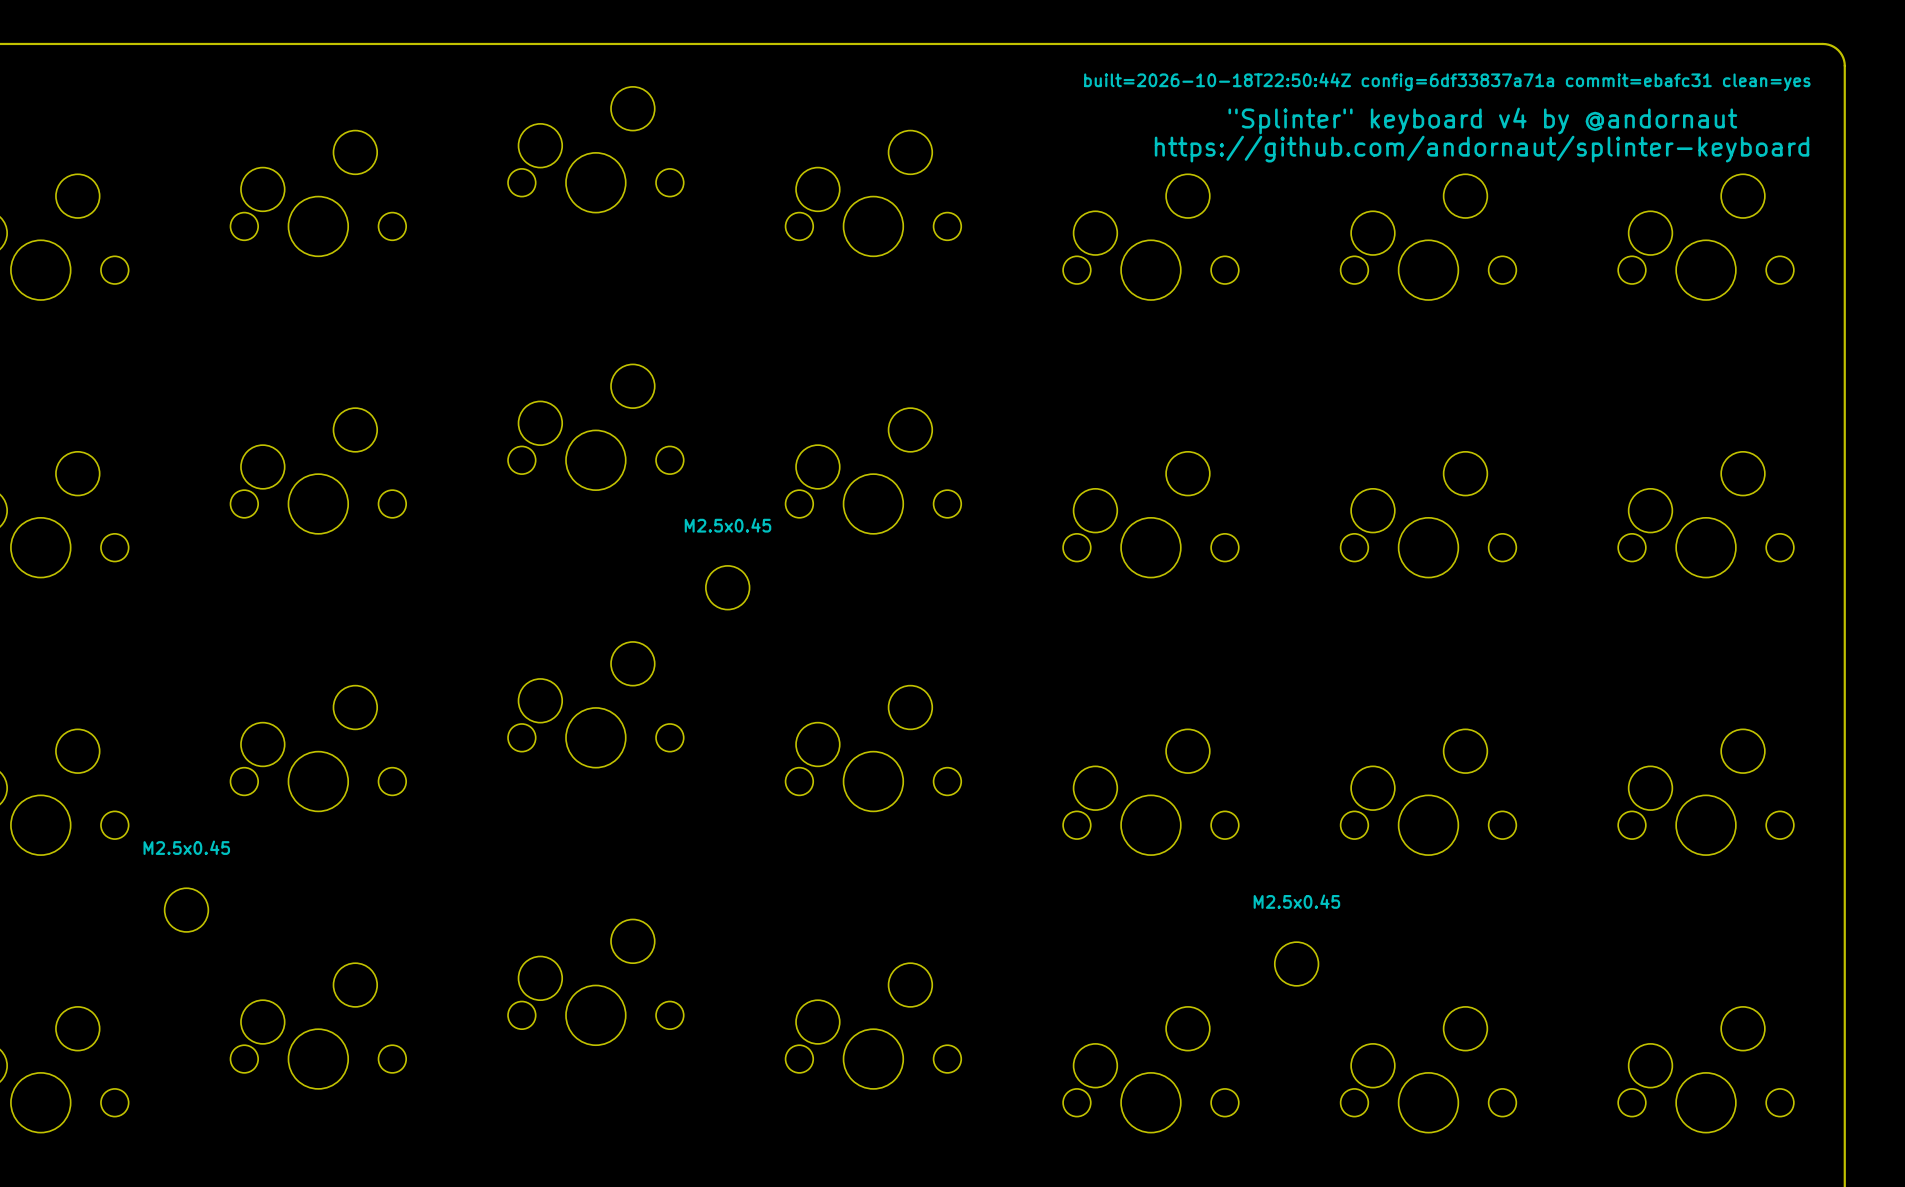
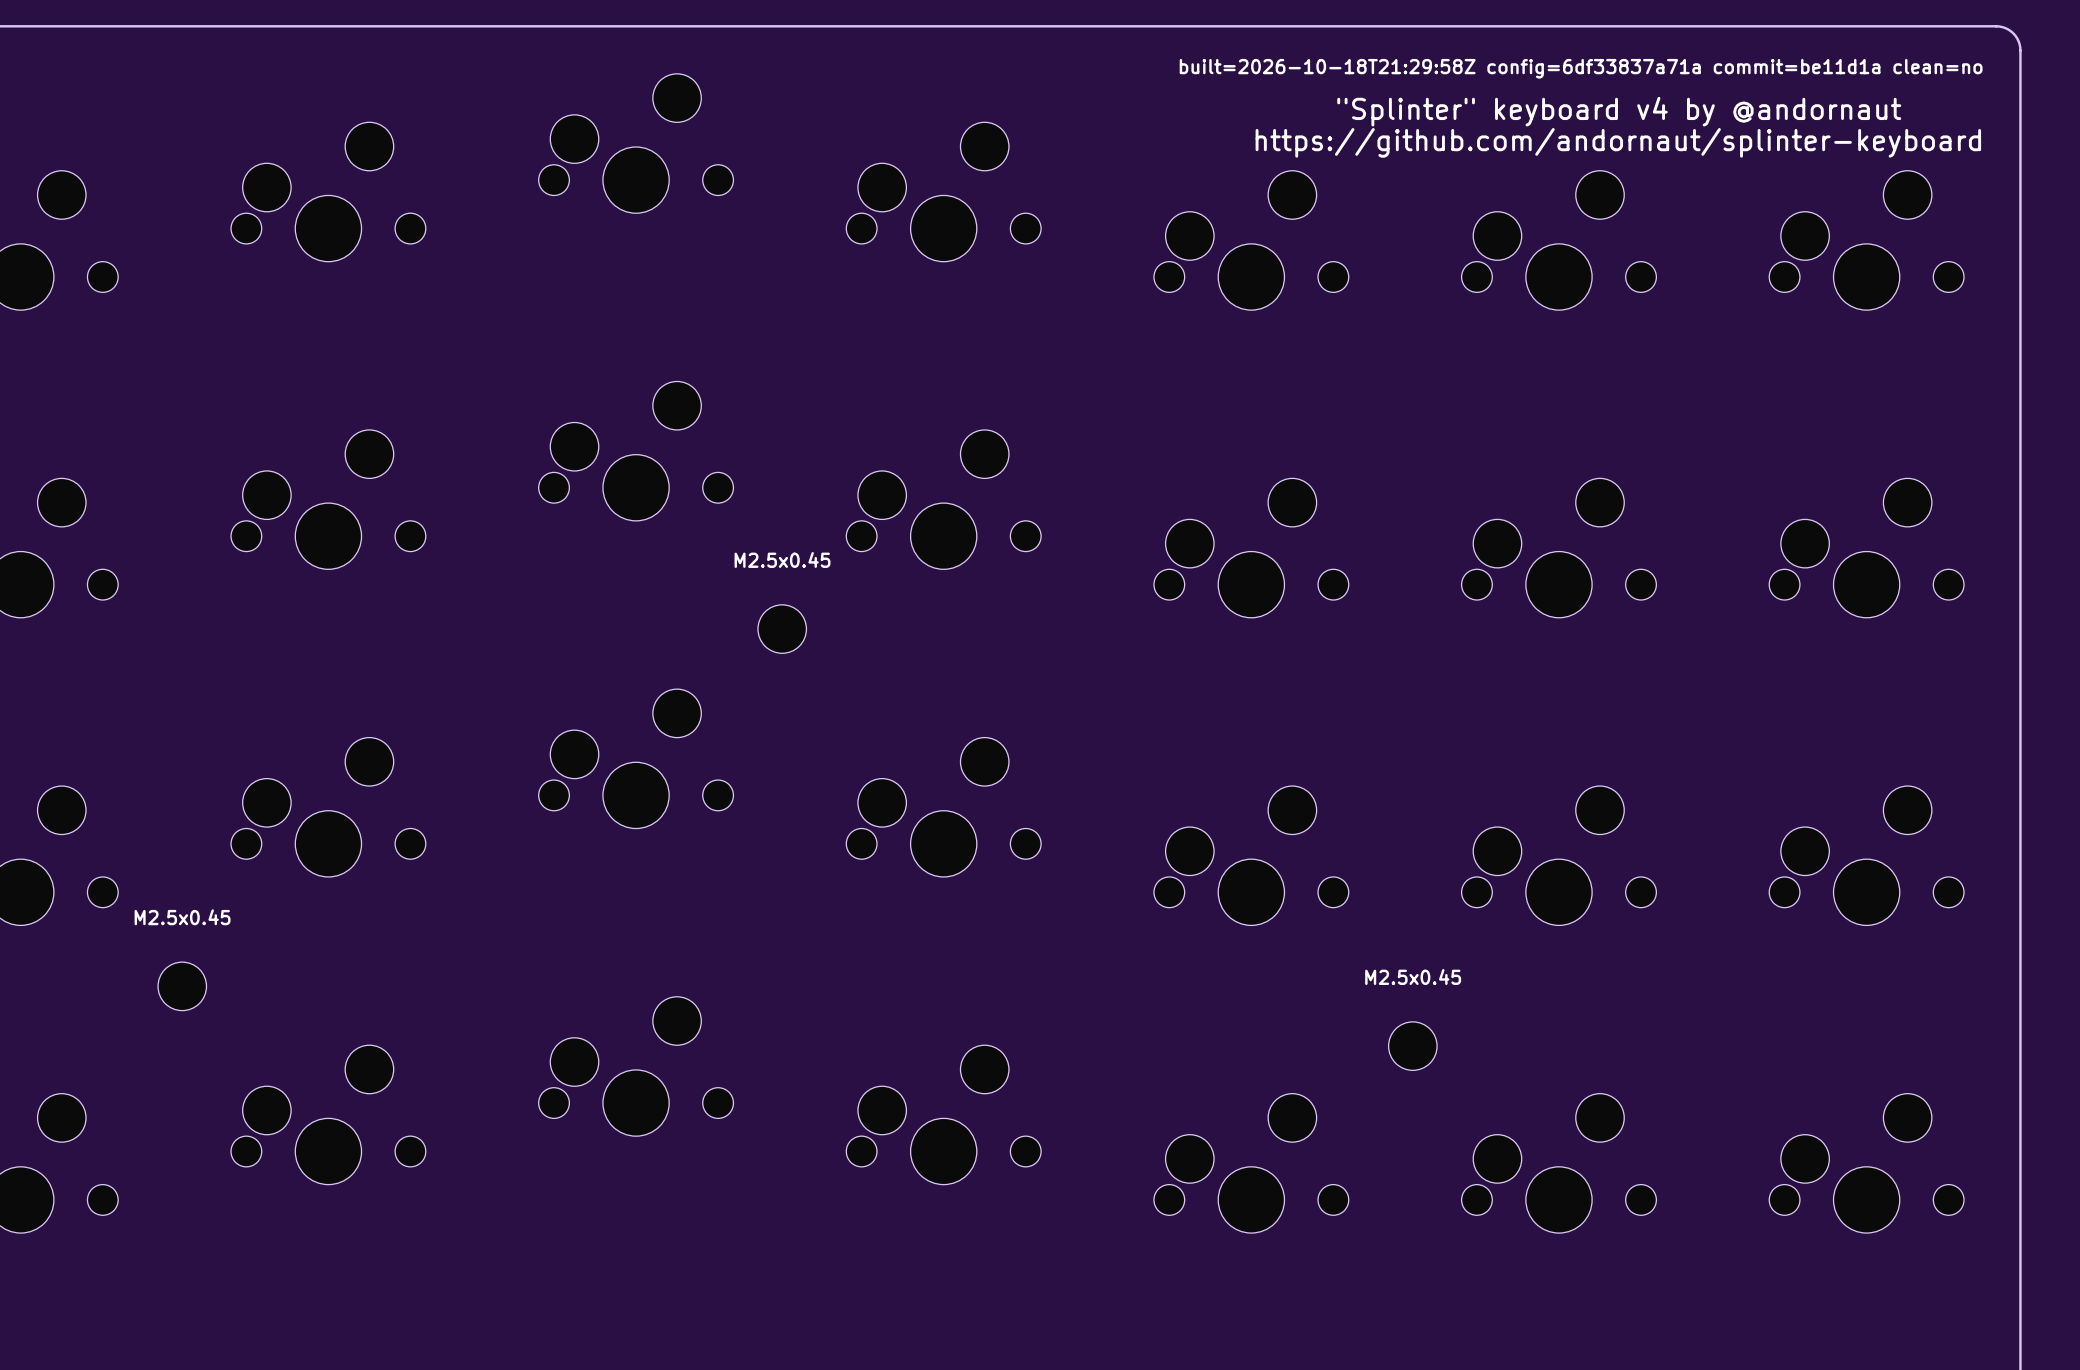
text: built=2026-10-18T22:50:44Z config=6df33837a71a commit=ebafc31 clean=yes (1447, 81) -> built=2026-10-18T21:29:58Z config=6df33837a71a commit=be11d1a clean=no (1581, 68)

